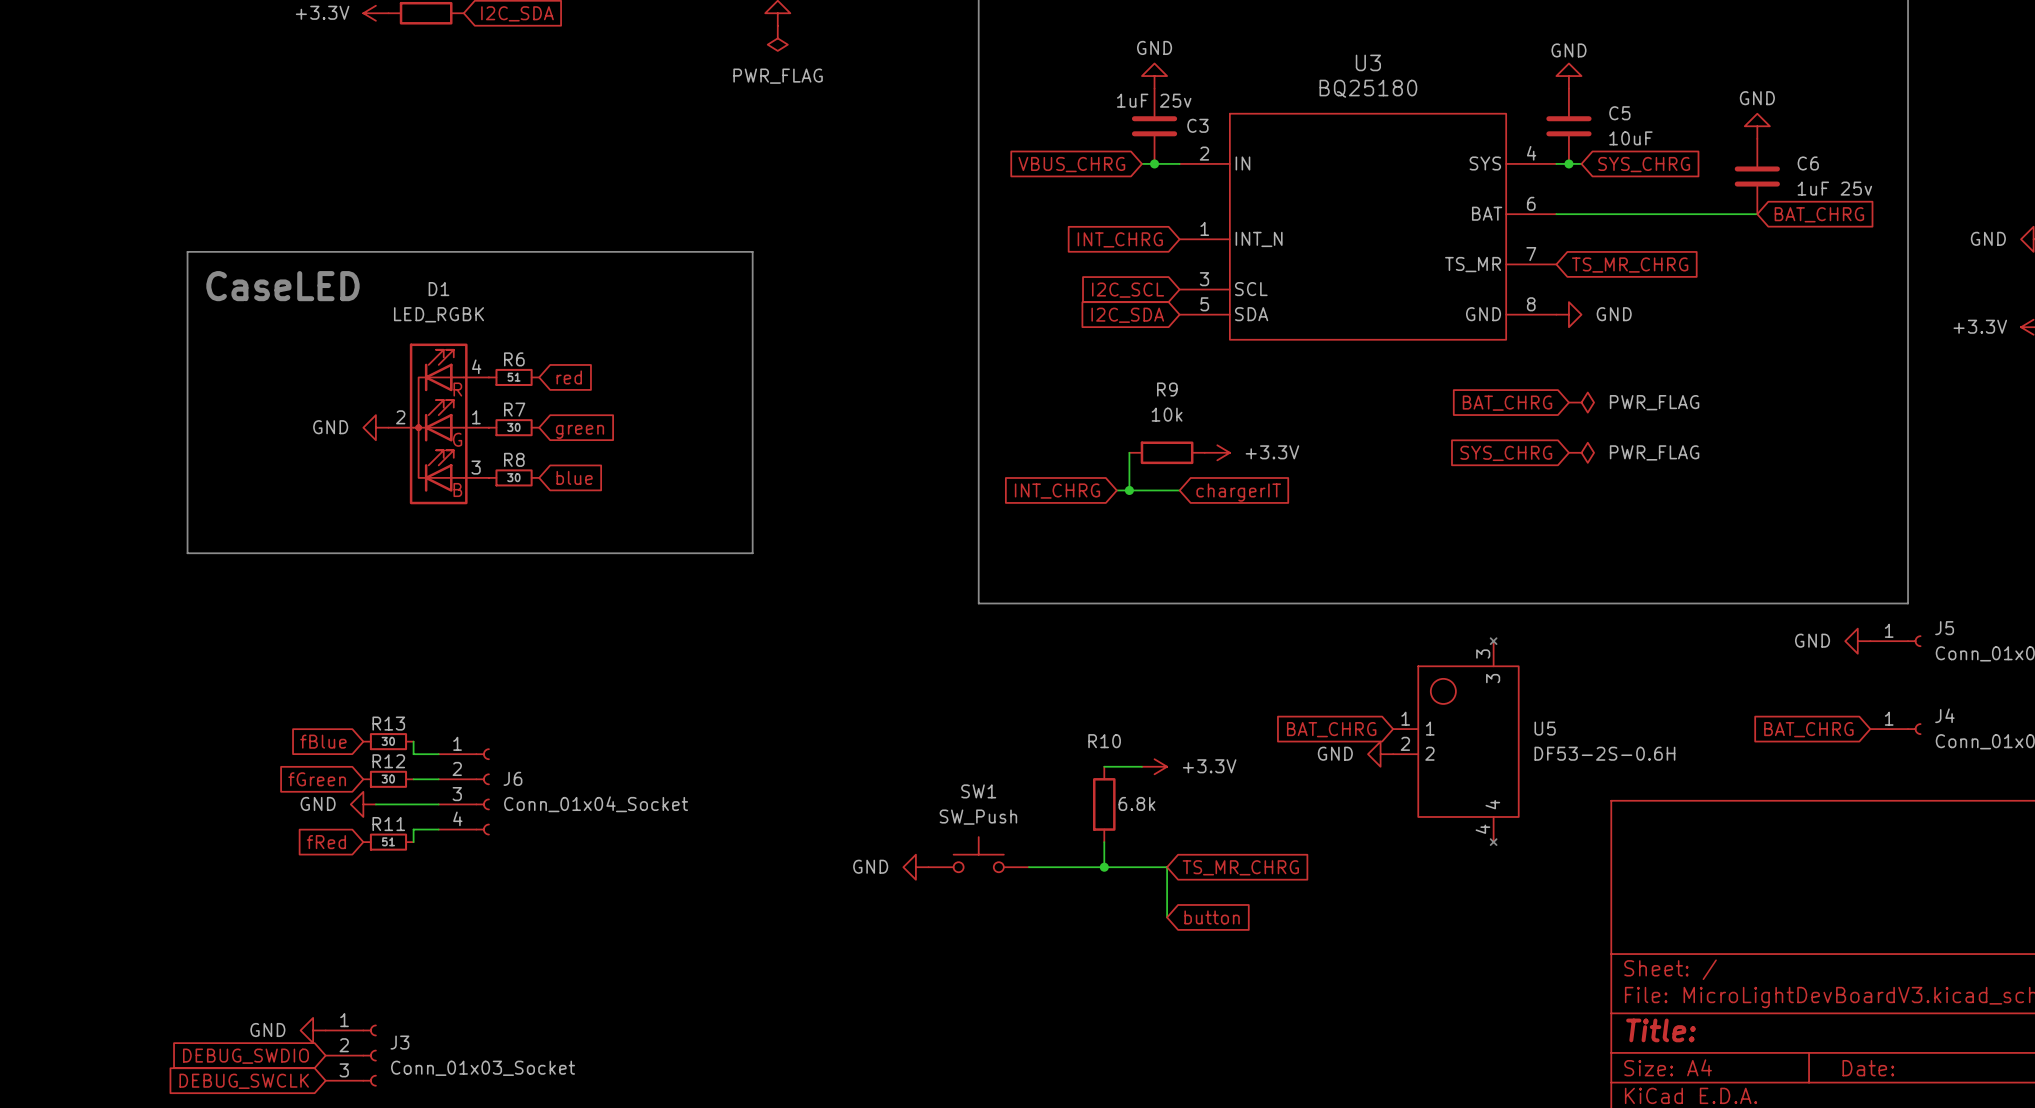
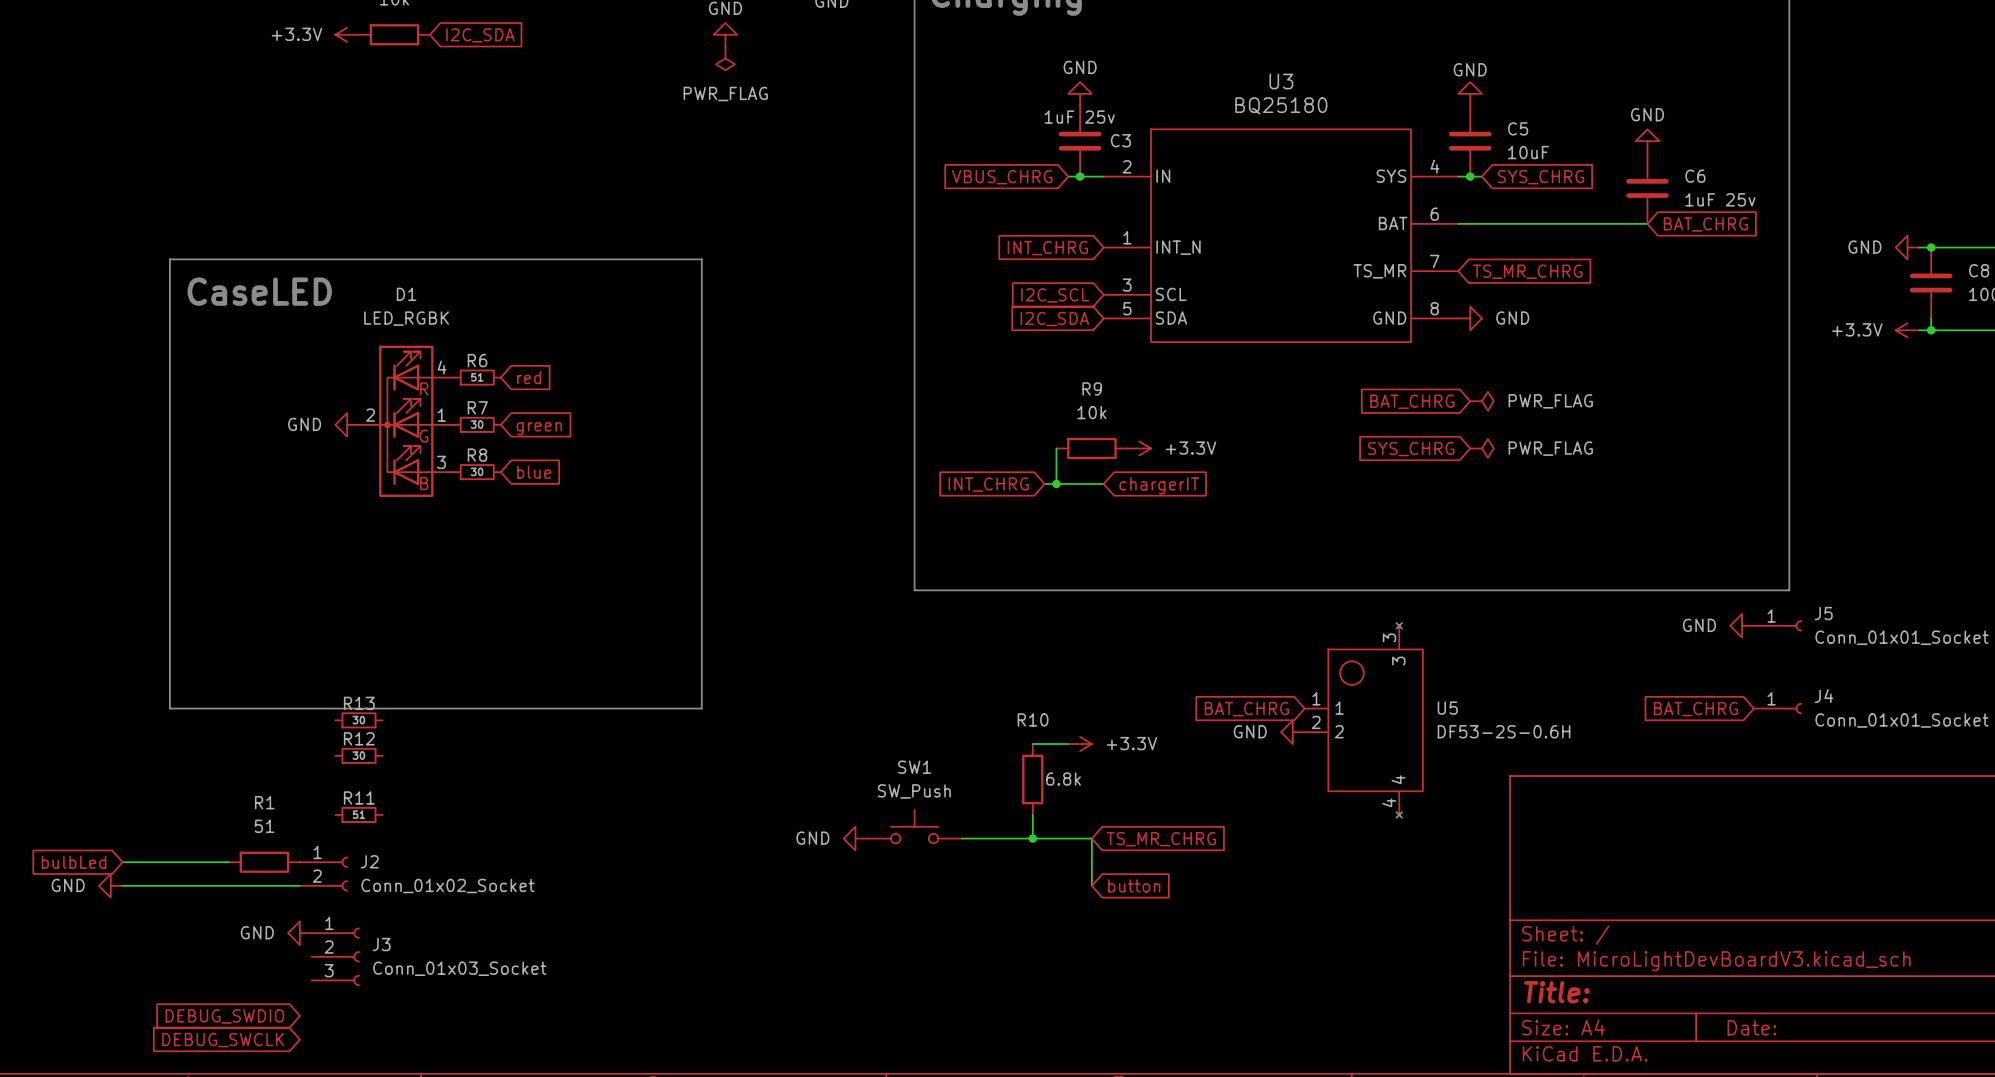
line: (187, 553) (752, 553) -> (169, 543) (169, 708) (701, 708) (701, 543)
global label: fBlue (323, 741) -> none
wire: (413, 741) (413, 754) (438, 754) -> none
global label: fGreen (317, 779) -> none
wire: (413, 779) (438, 779) -> none
J6: Conn_01x04_Socket (464, 791) -> none
power symbol: GND (363, 804) -> none
wire: (375, 804) (438, 804) -> none
wire: (438, 829) (413, 829) (413, 842) -> none
global label: fRed (326, 842) -> none
global label: none -> bulbLed (74, 862)
wire: none -> (122, 862) (228, 862)
R1: none -> 51 (264, 862)
J2: none -> Conn_01x02_Socket (323, 874)
power symbol: none -> GND (110, 885)
wire: none -> (122, 885) (299, 885)
power symbol position: GND (313, 1030) -> GND (299, 933)
J3 position: (351, 1055) -> (335, 956)

